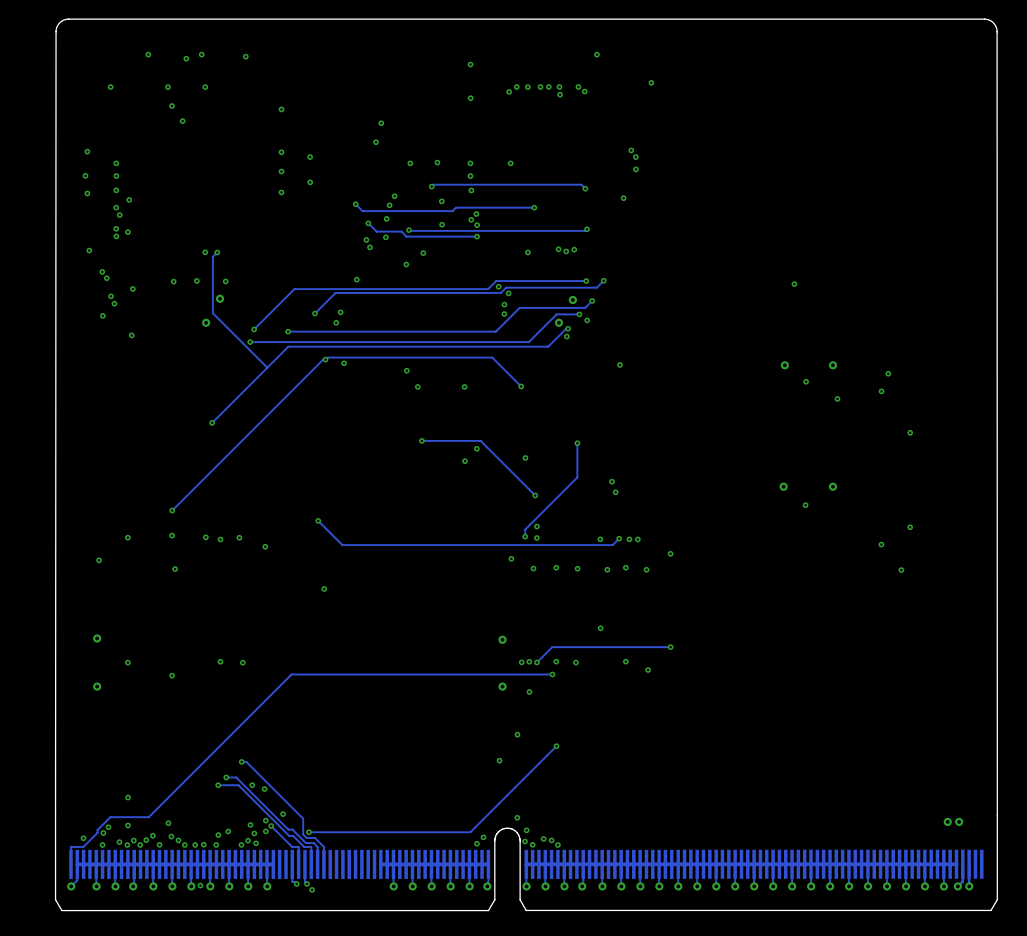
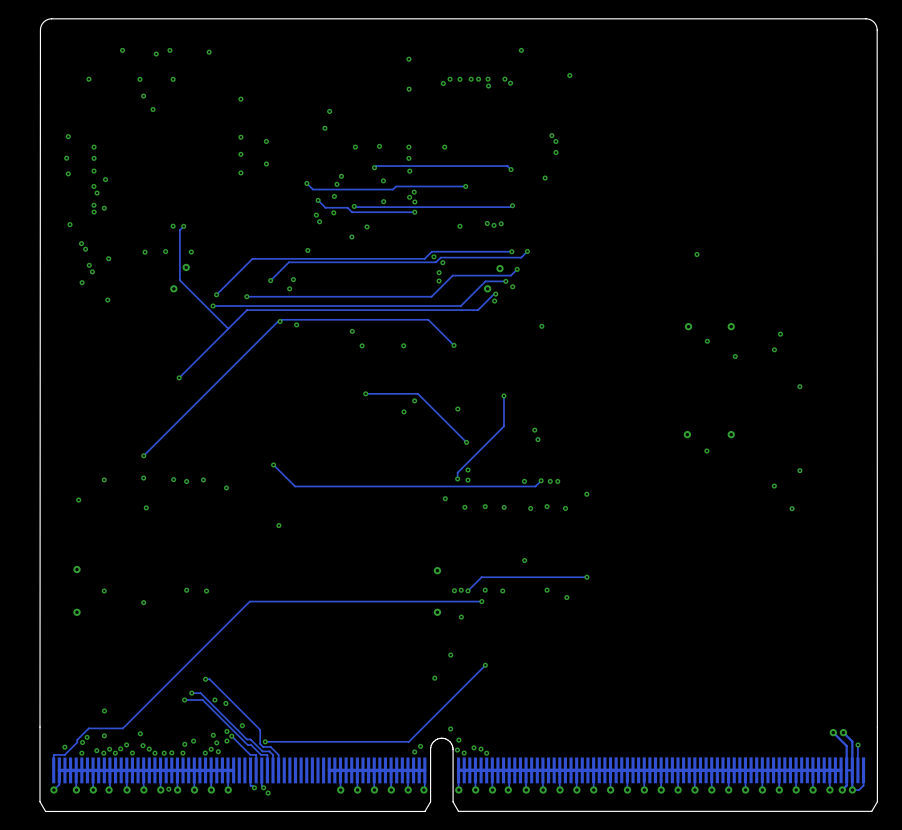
track: none -> (843, 732) (852, 741) (852, 770) (846, 770) (846, 746) (833, 732)
track: none -> (857, 745) (857, 770)
via: none -> (858, 745)
track: none -> (863, 770) (863, 785) (859, 789) (852, 789)

